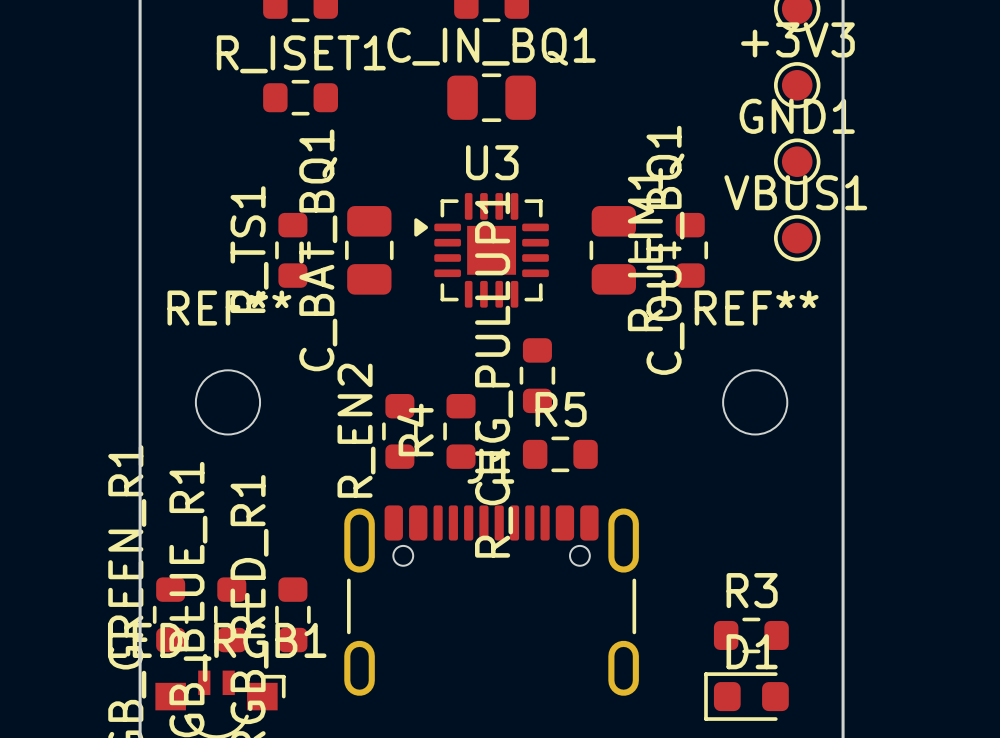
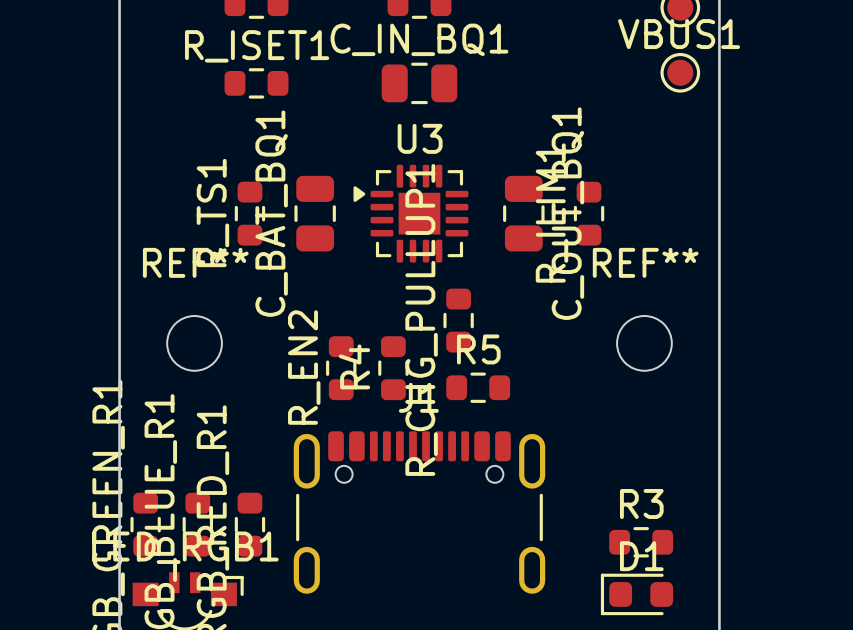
+3V3 name: +3V3 (797, 39) -> VBUS1 (679, 34)
GND1: (797, 161) -> none
VBUS1: (797, 238) -> none

